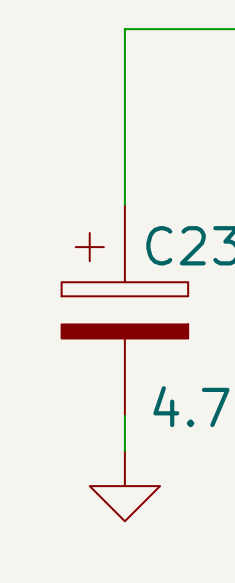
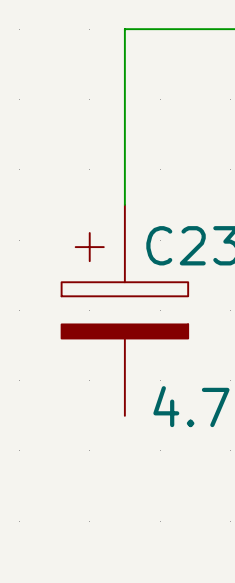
wire: (124, 415) (124, 450) -> none
power symbol: (124, 486) -> none

